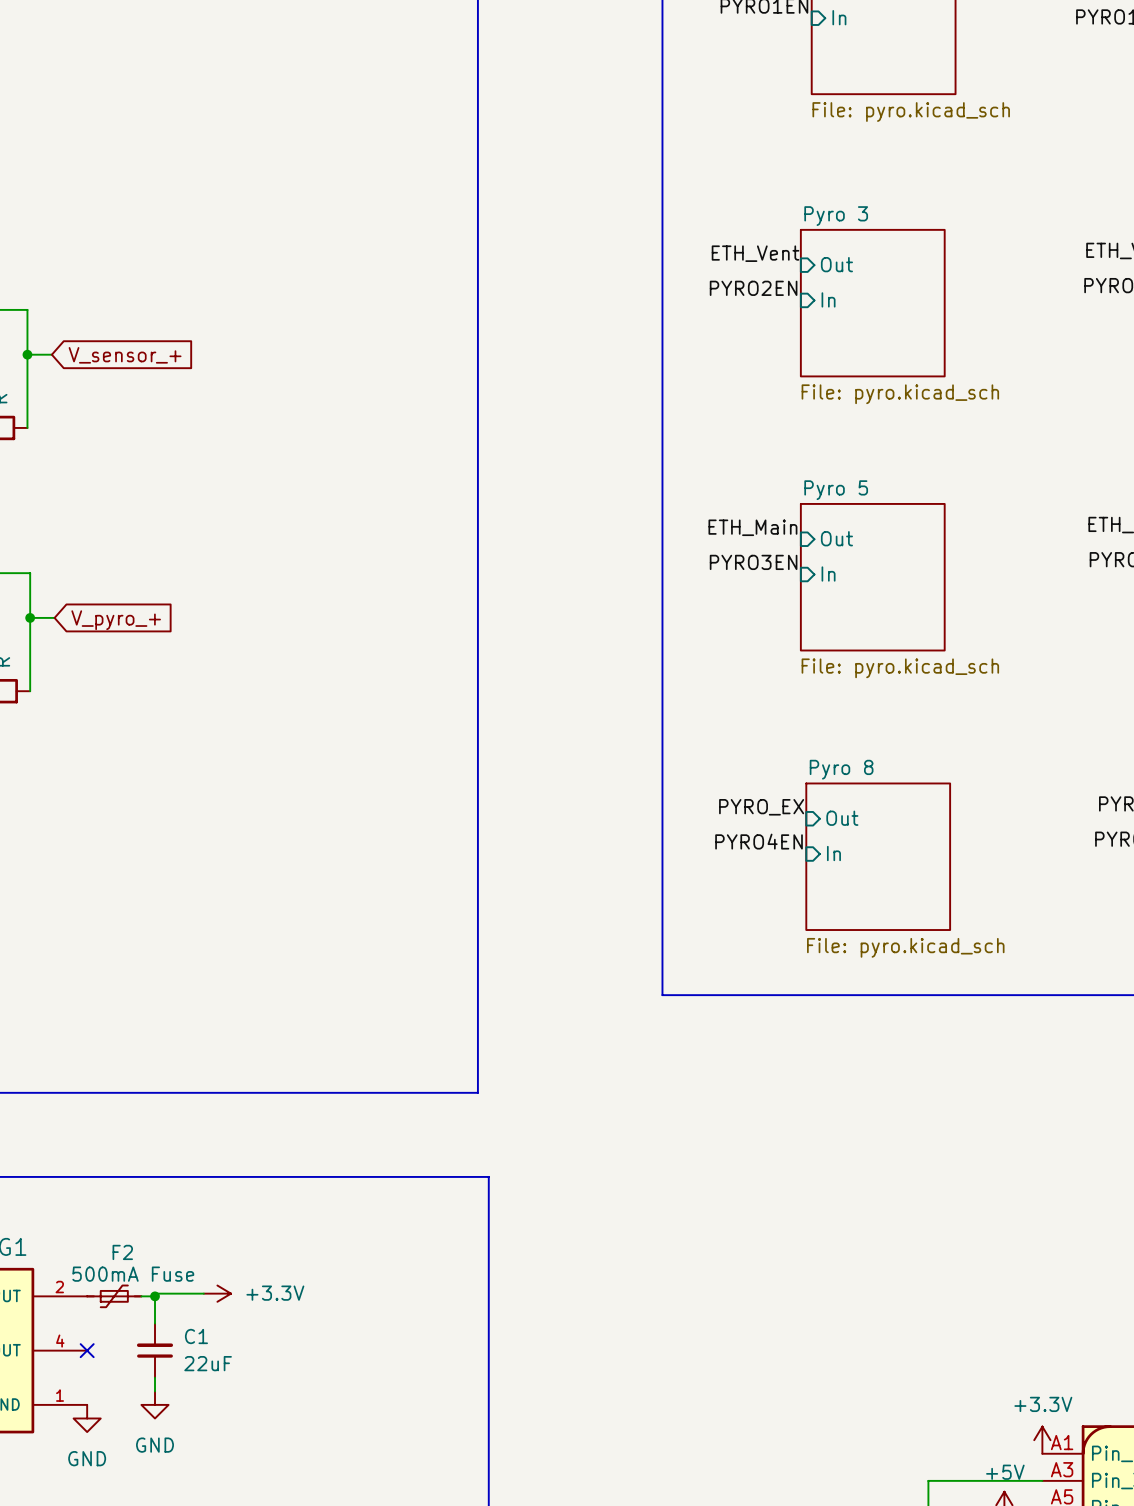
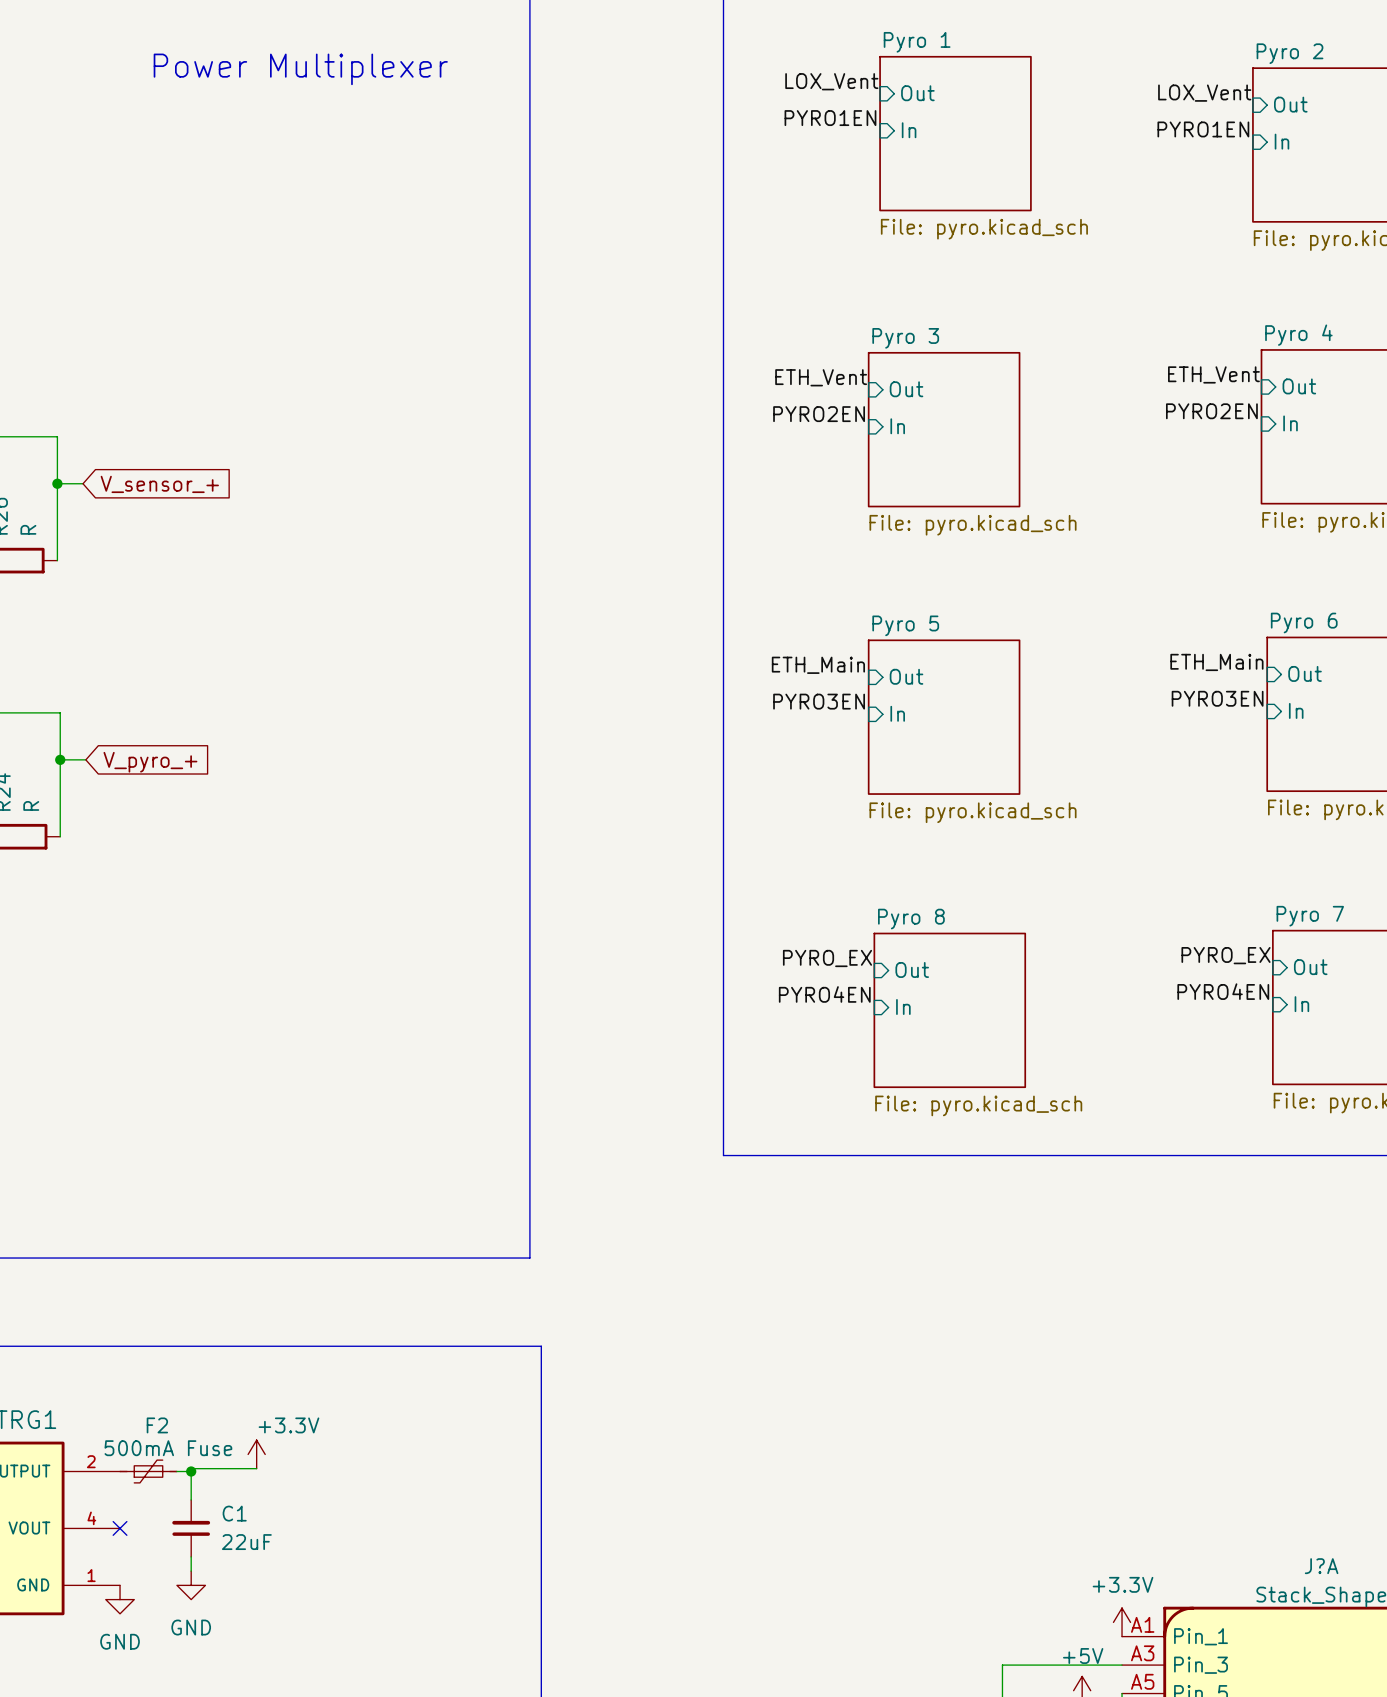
power symbol rotation: 0° (217, 1293) -> 90° counterclockwise (256, 1454)
power symbol text position: +3.3V (275, 1293) -> +3.3V (288, 1425)

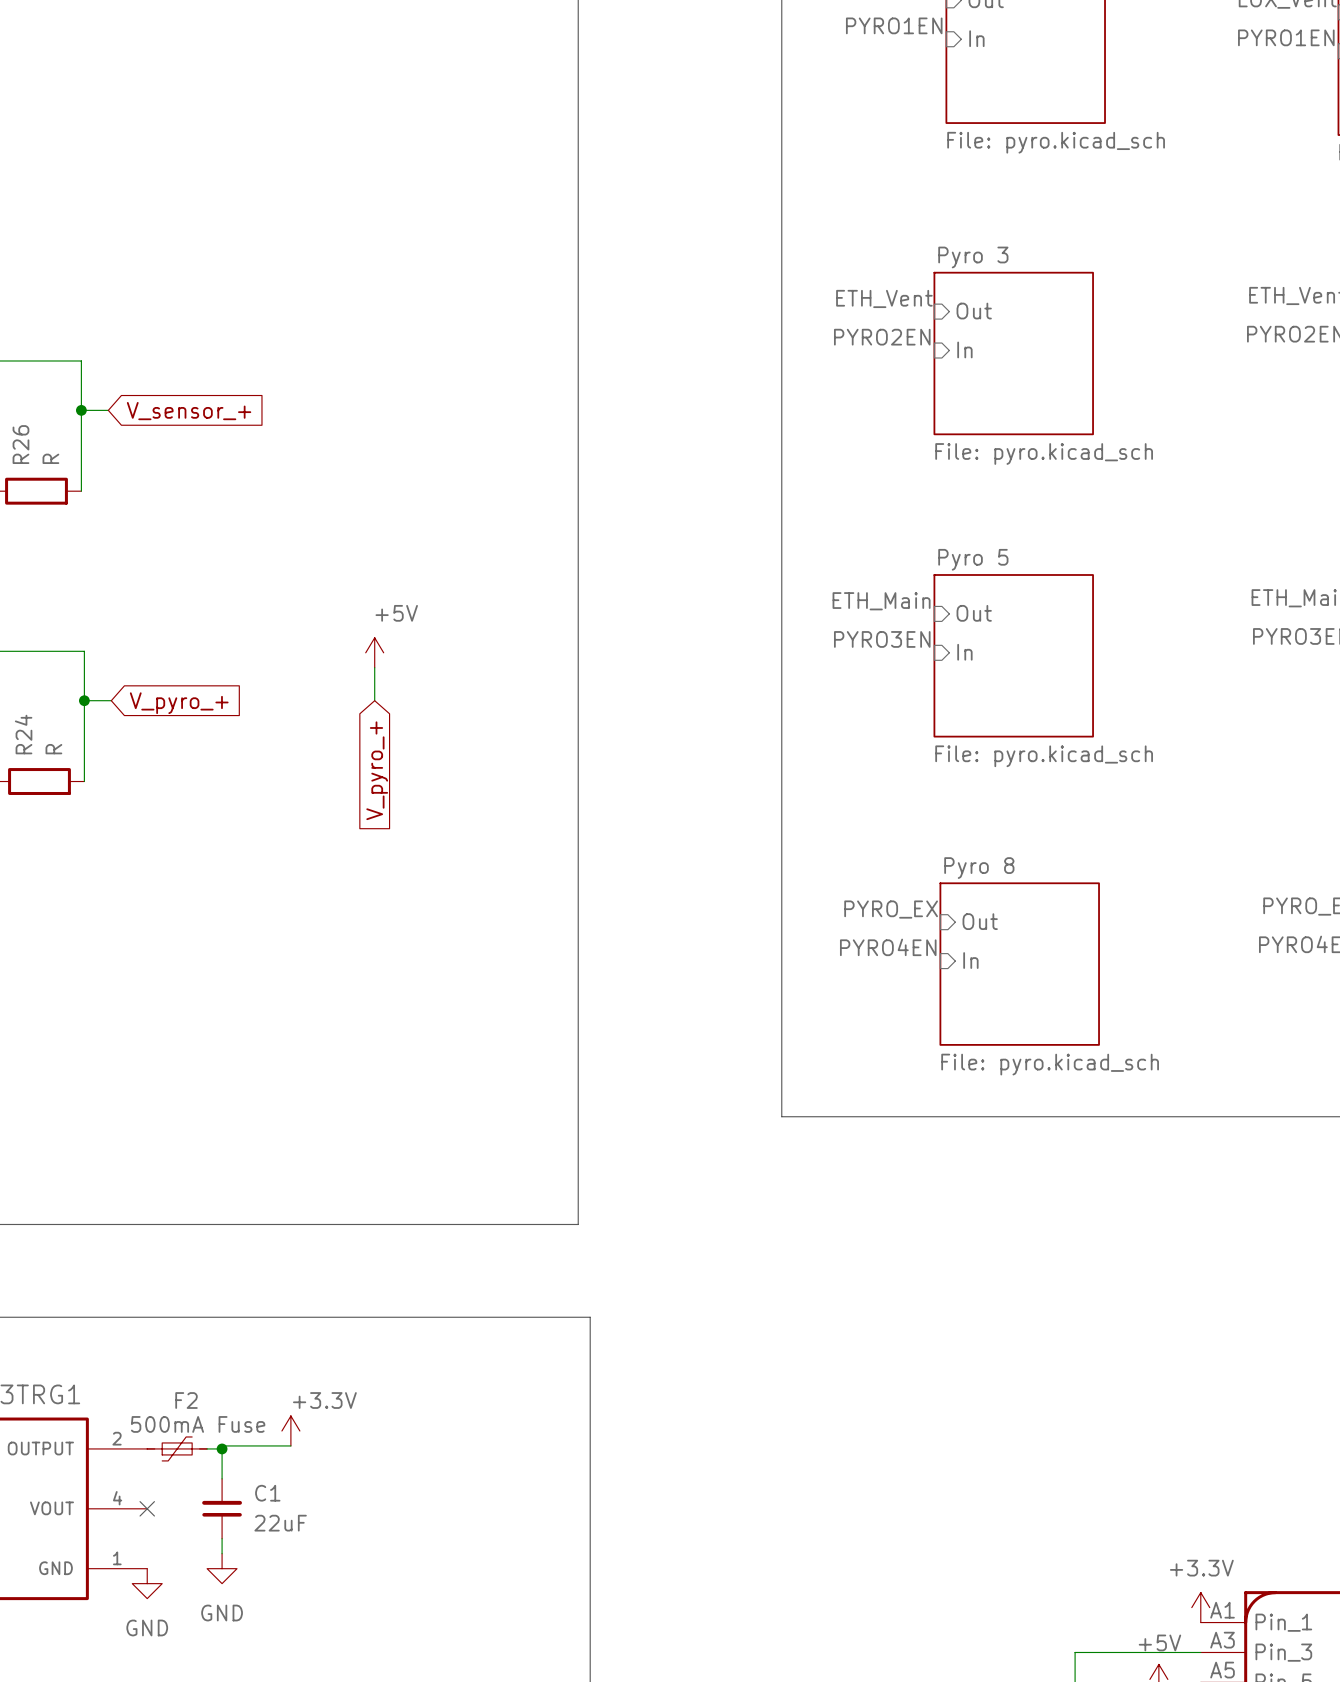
power symbol: none -> +5V (374, 652)
wire: none -> (374, 667) (374, 700)
global label: none -> V_pyro_+ (377, 770)

